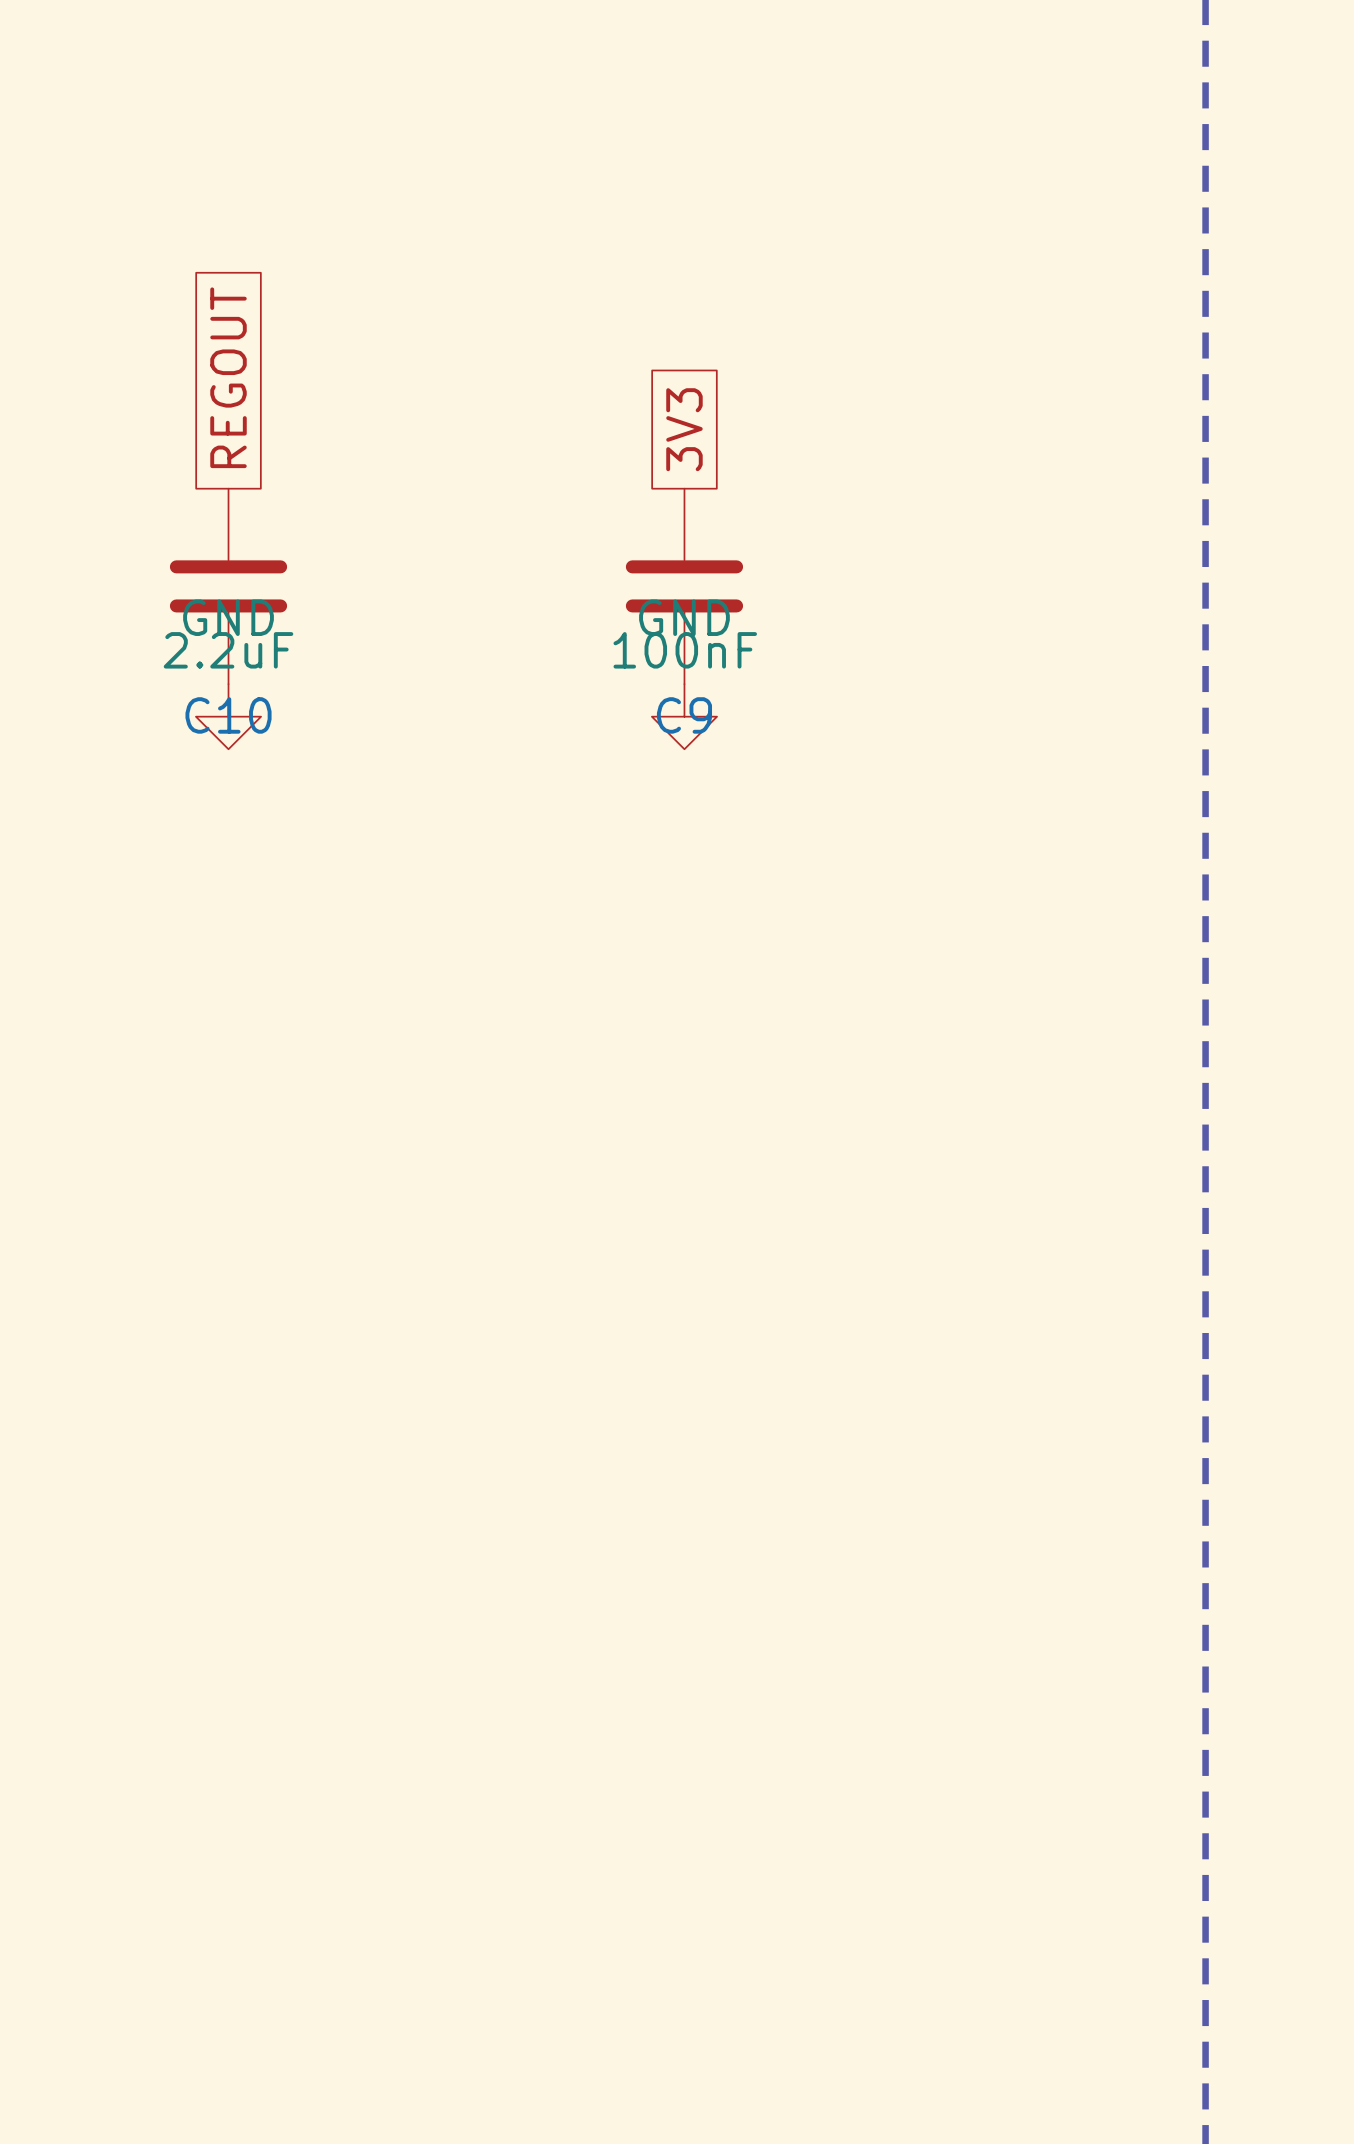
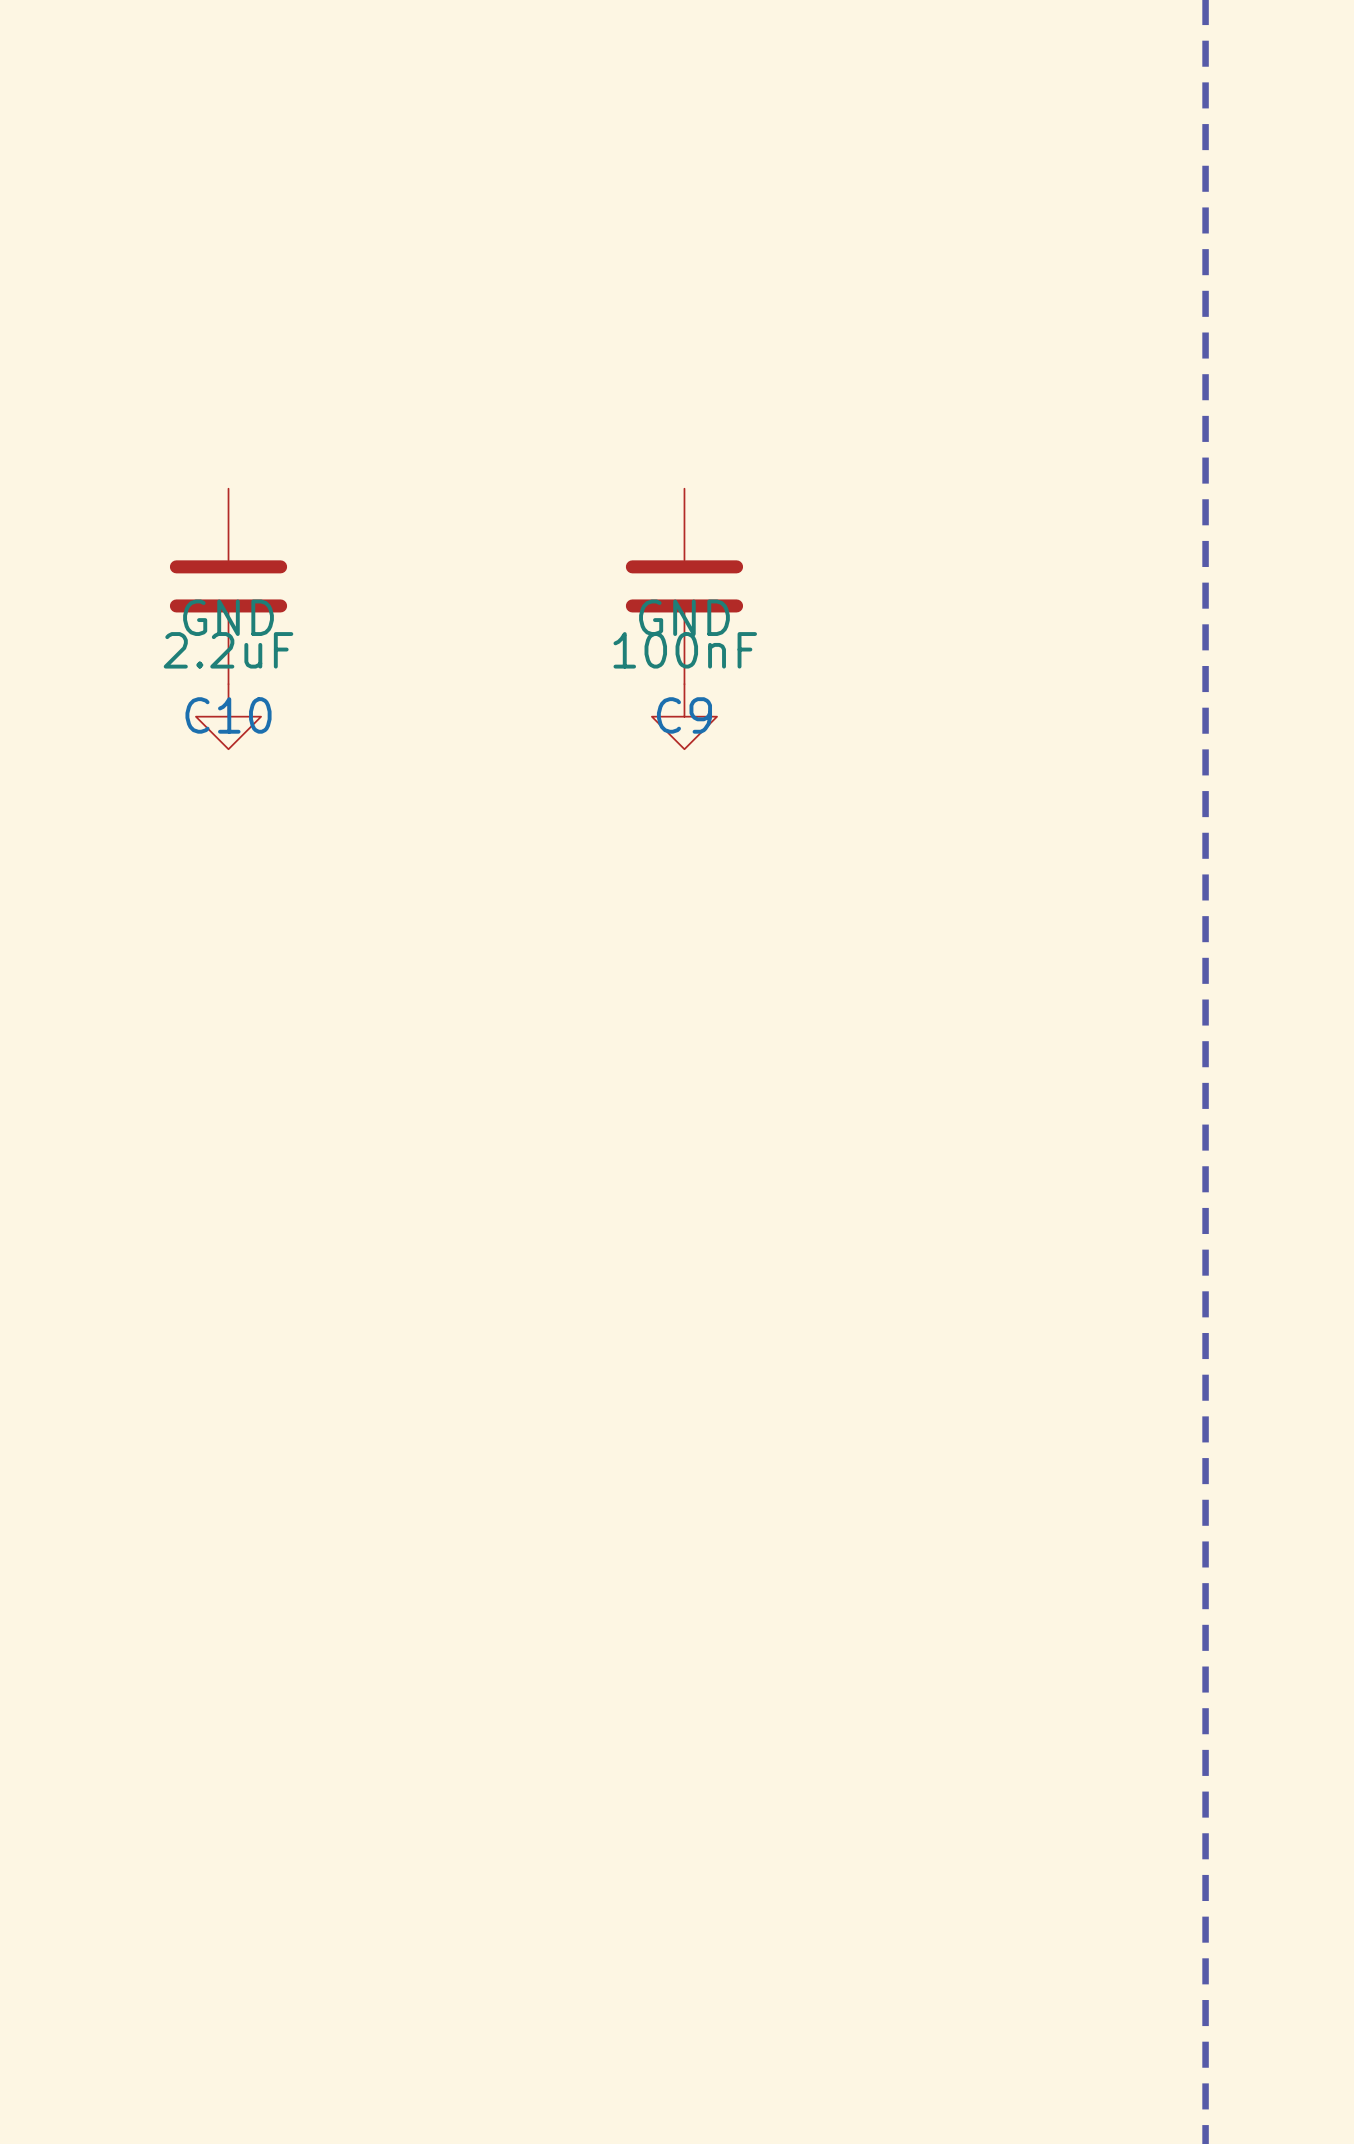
global label: REGOUT (228, 377) -> none
global label: 3V3 (684, 429) -> none

